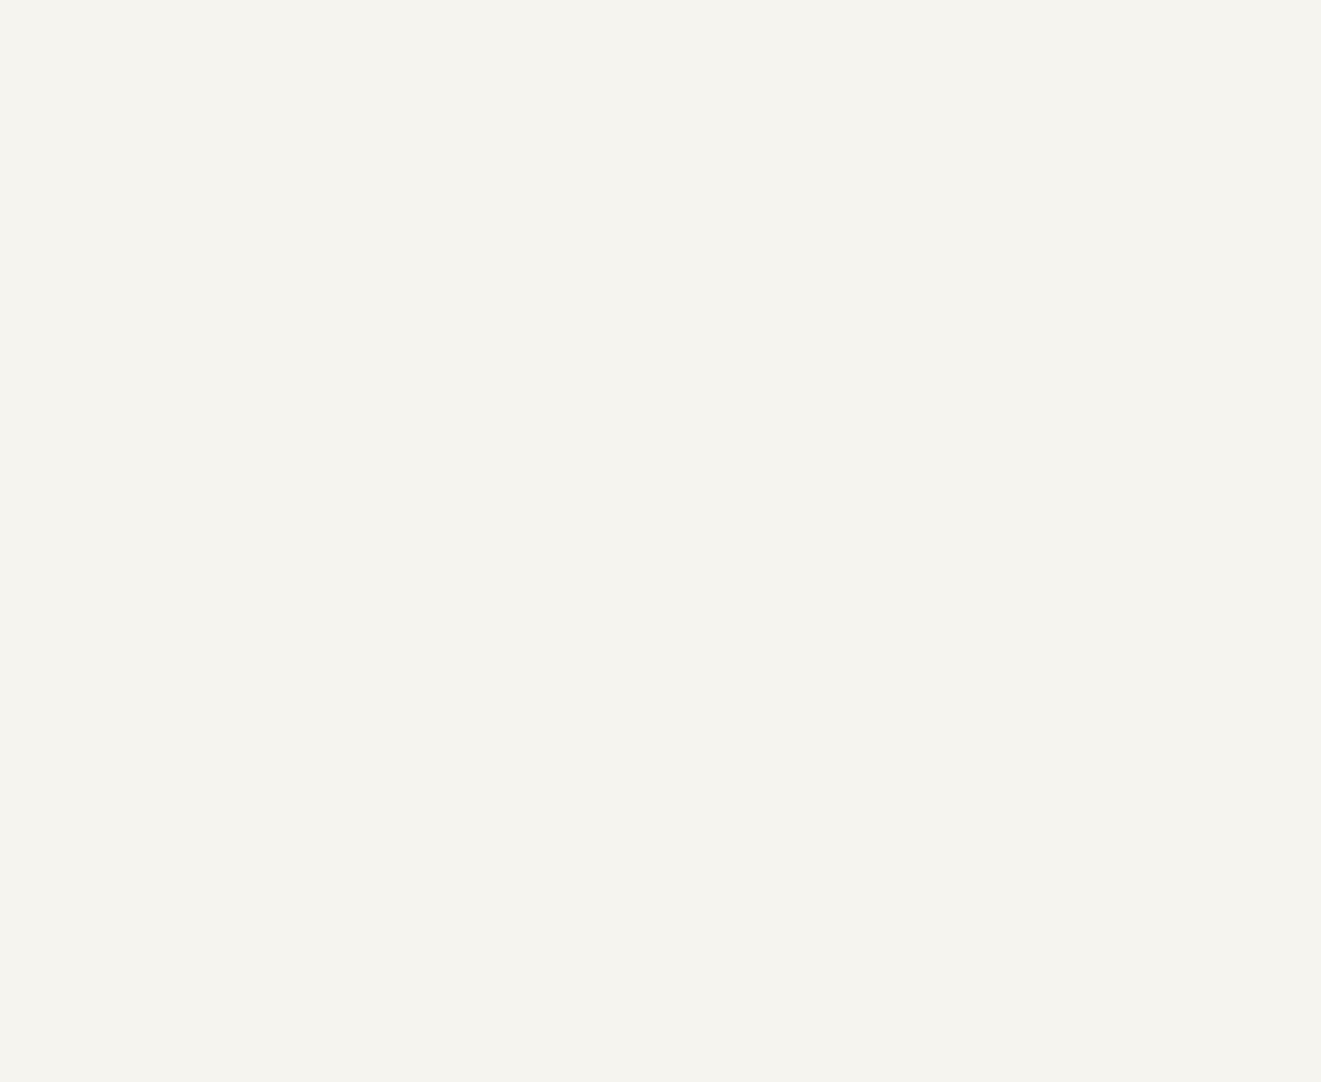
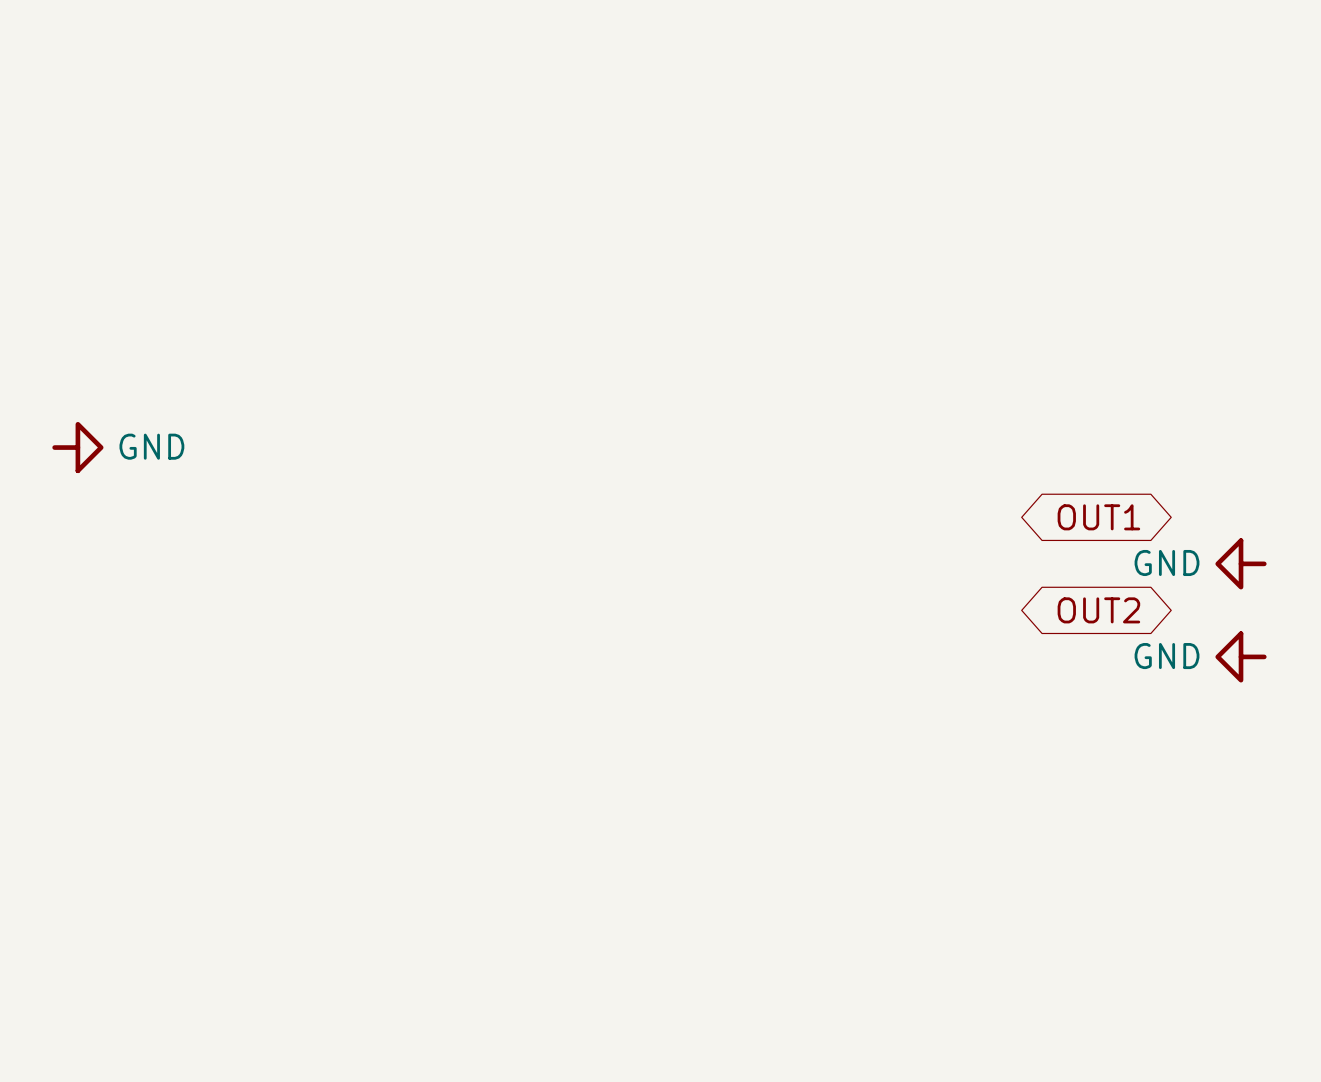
power symbol: none -> GND (77, 447)
global label: none -> OUT1 (1098, 517)
power symbol: none -> GND (1241, 563)
global label: none -> OUT2 (1098, 610)
power symbol: none -> GND (1241, 656)

